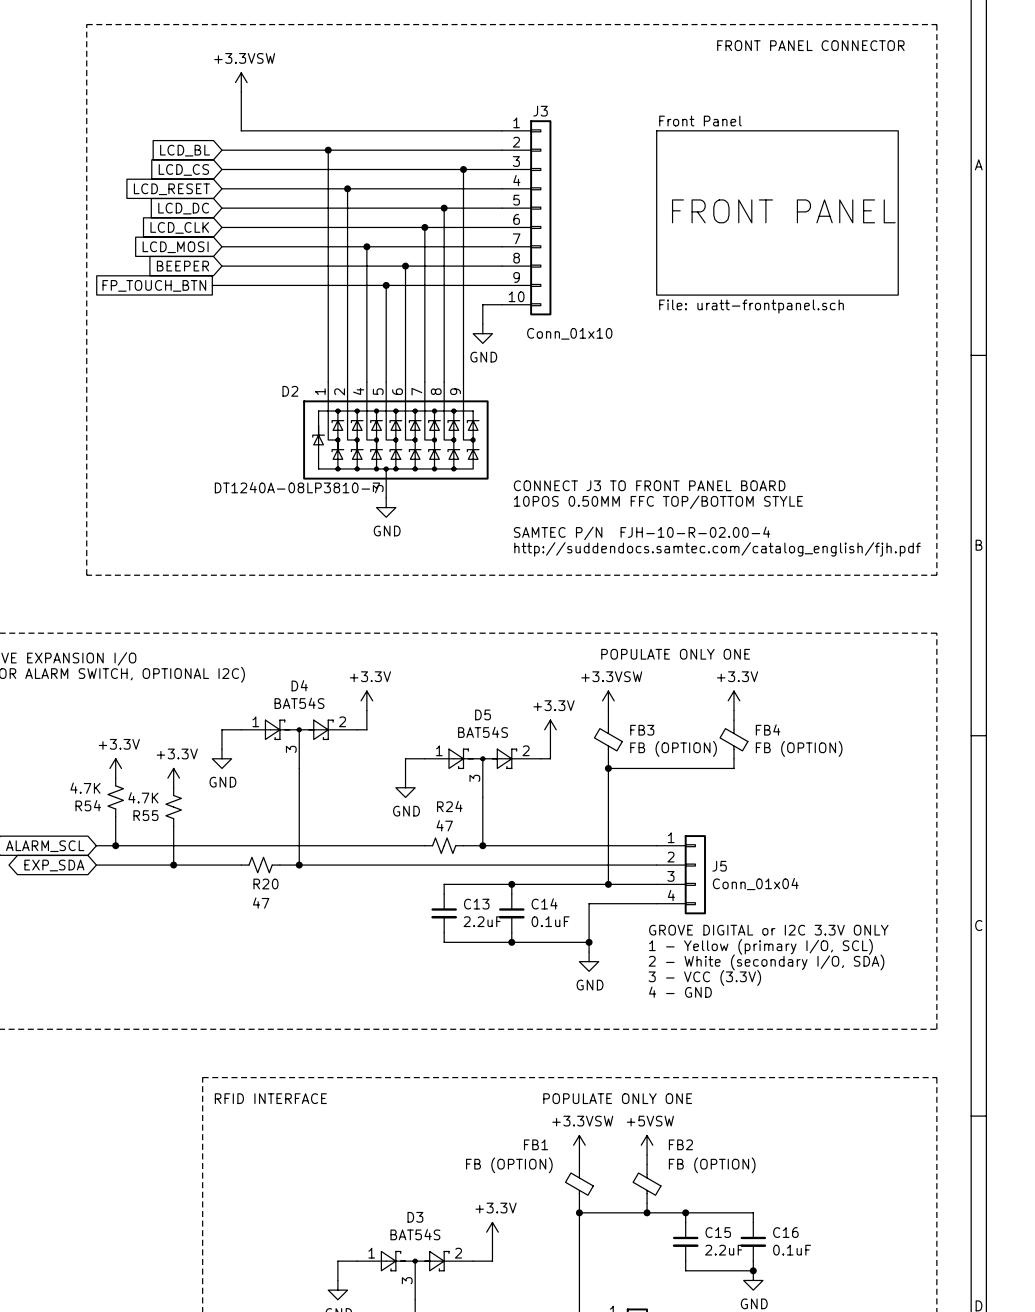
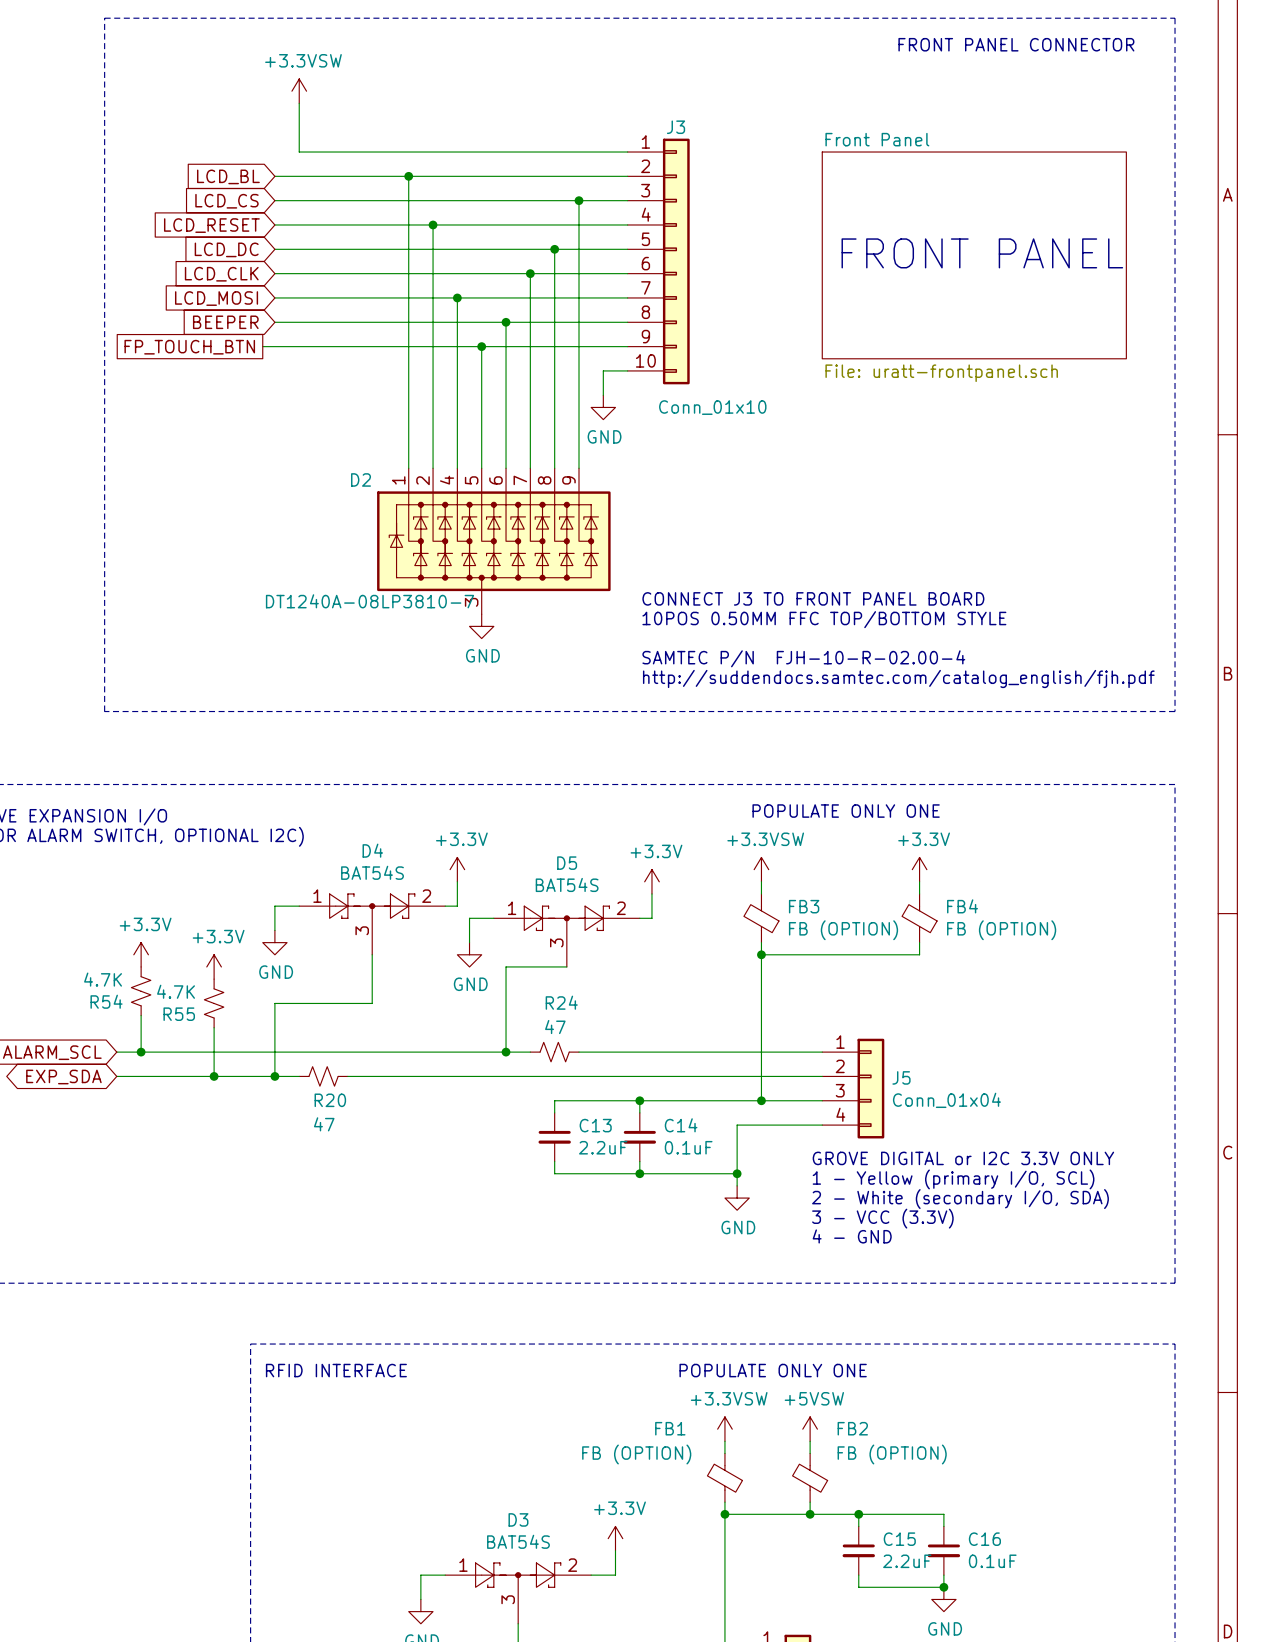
power symbol position: +3.3V (550, 729) -> +3.3V (651, 881)
wire: (550, 739) (550, 758) (540, 758) -> (651, 893) (651, 918) (639, 918)
wire: (424, 758) (405, 758) (405, 778) -> (493, 918) (469, 918) (469, 942)
D5 position: (482, 773) -> (566, 936)
wire: none -> (566, 966) (506, 966) (506, 1052)
power symbol position: GND (405, 787) -> GND (469, 954)
wire: (482, 797) (482, 845) -> none
wire: (299, 807) (299, 865) -> (372, 1003) (274, 1003) (274, 1076)
junction: none -> (506, 1052)
junction: (482, 845) -> none
junction: none -> (274, 1076)
junction: (299, 865) -> none

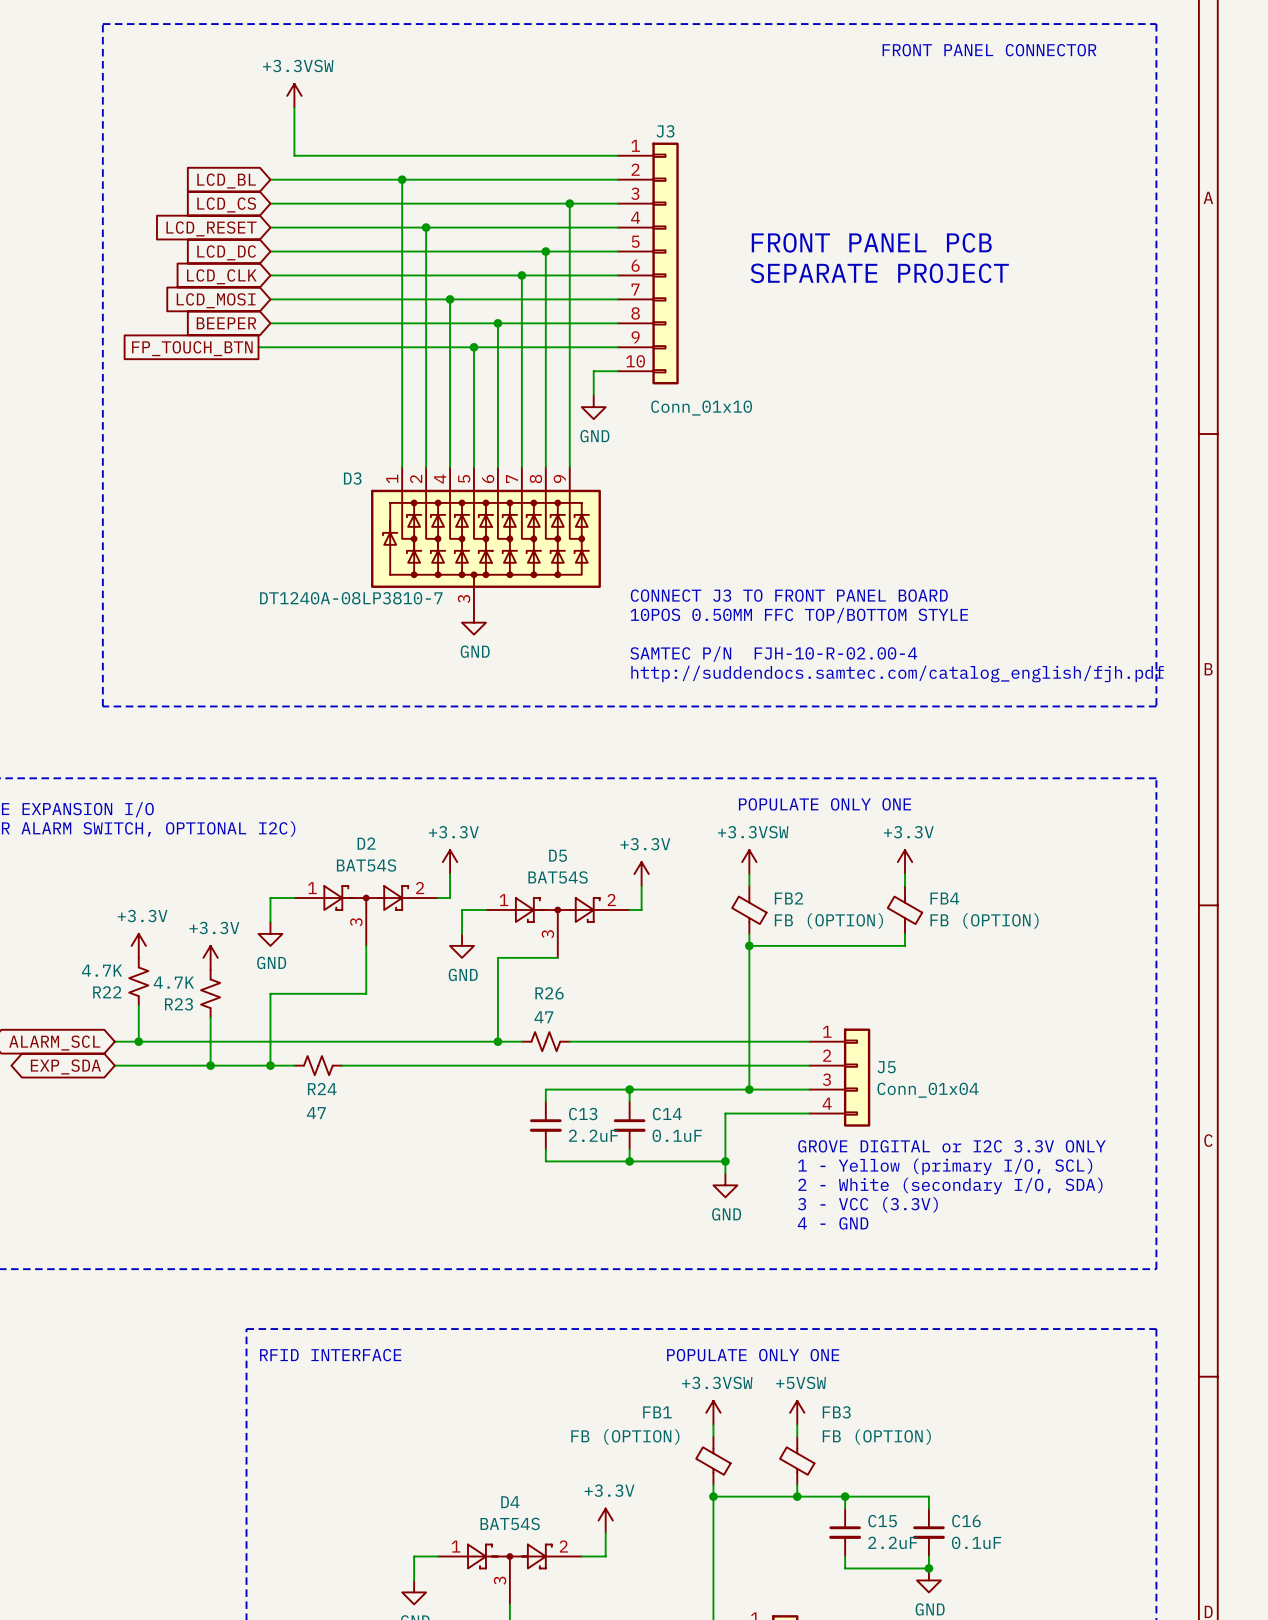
text: FRONT PANEL (982, 253) -> FRONT PANEL PCB (871, 242)
sheet Front Panel: File: uratt-frontpanel.sch (974, 255) -> none
text: none -> SEPARATE PROJECT (879, 273)
D2 name: D2 (361, 479) -> D3 (352, 478)
D4 name: D4 (372, 850) -> D2 (366, 843)
FB3 name: FB3 (804, 906) -> FB2 (788, 898)
R54 name: R54 (106, 1001) -> R22 (107, 992)
R24 name: R24 (561, 1002) -> R26 (549, 993)
R55 name: R55 (179, 1014) -> R23 (178, 1004)
R20 name: R20 (330, 1100) -> R24 (322, 1089)
FB2 name: FB2 (852, 1428) -> FB3 (836, 1412)
D3 name: D3 (518, 1519) -> D4 (510, 1502)

